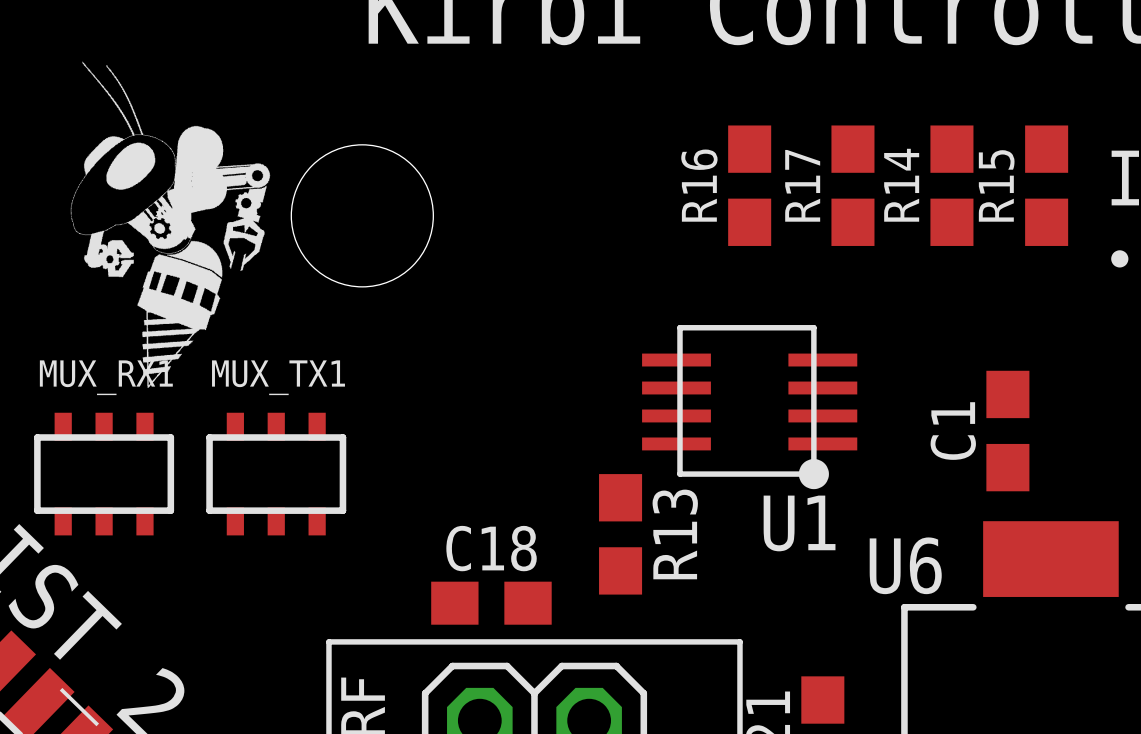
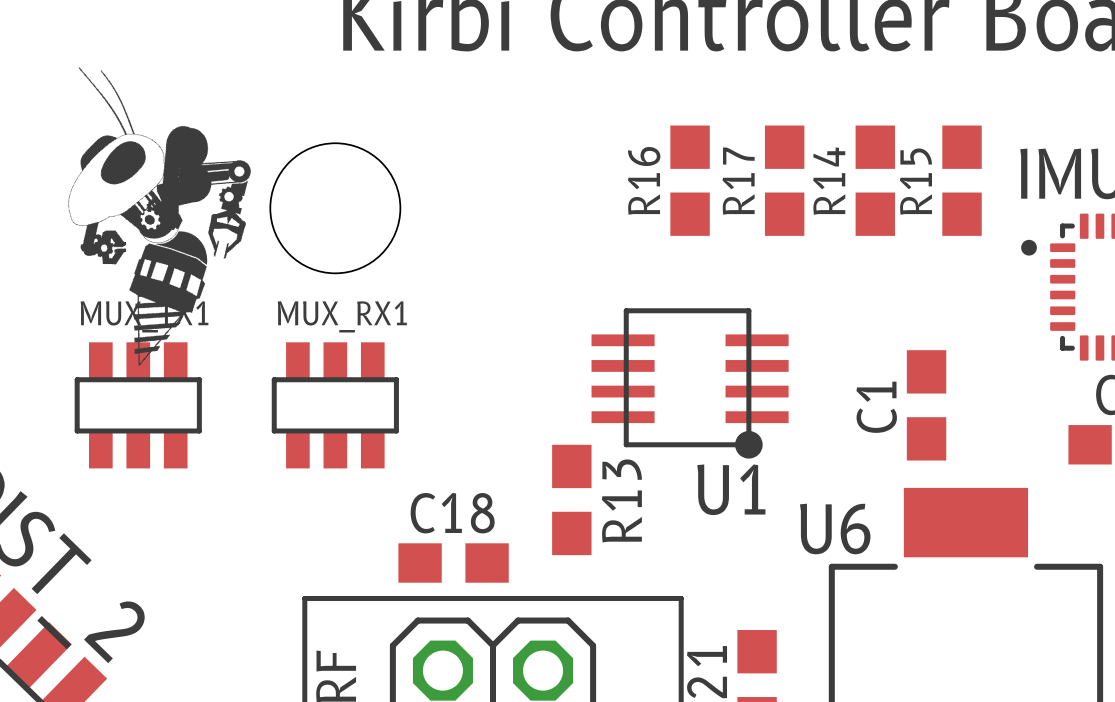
MUX_RX1 footprint: [34, 412, 175, 536] -> [271, 342, 399, 469]
MUX_TX1 footprint: [206, 412, 347, 536] -> [74, 342, 202, 469]

